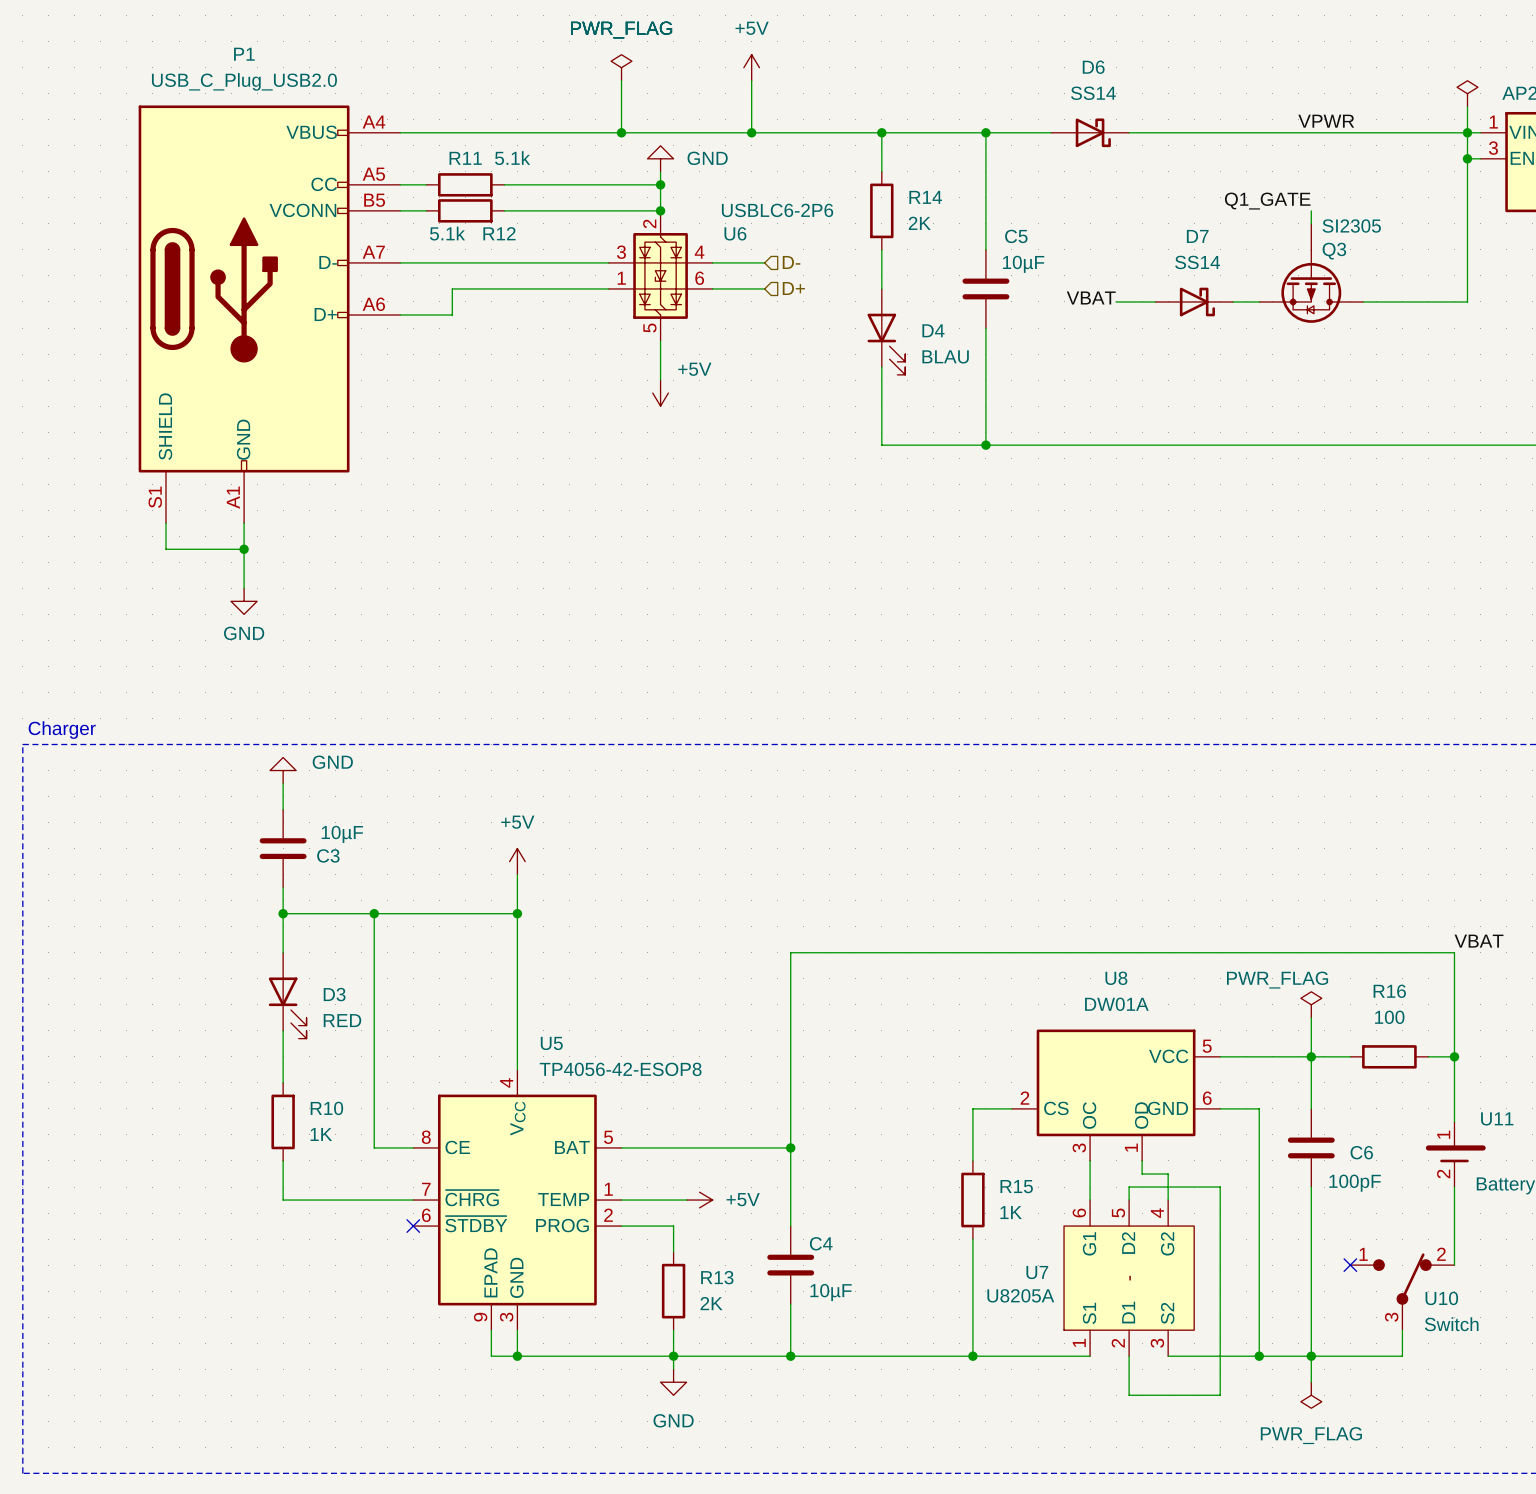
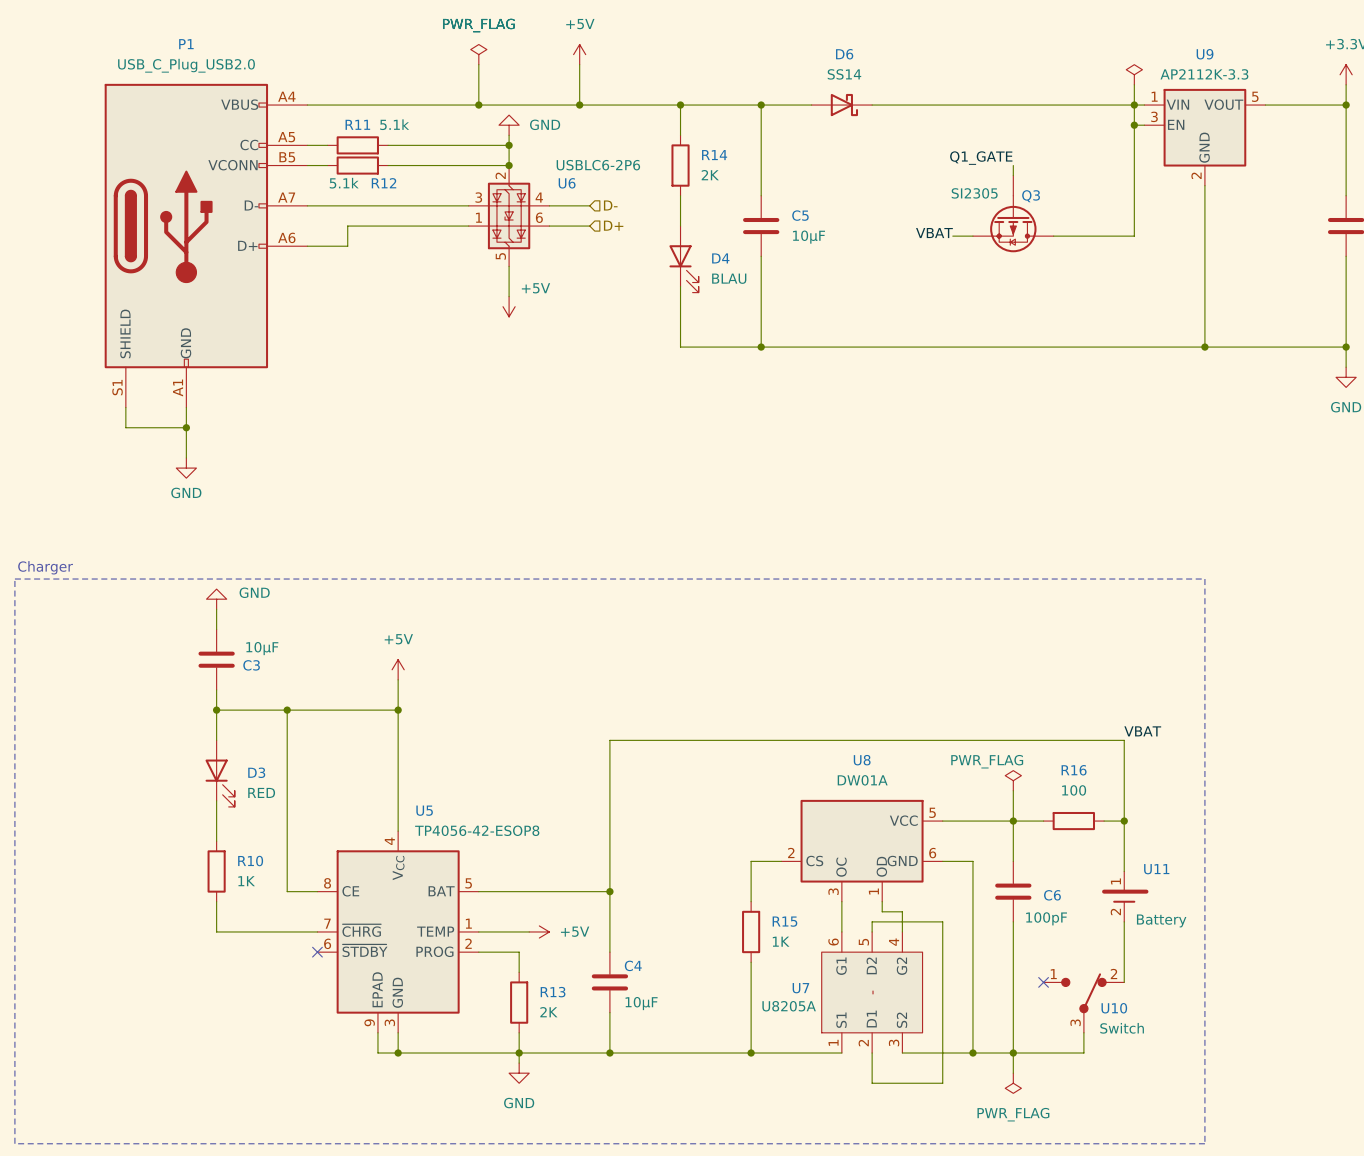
label: VPWR (1326, 121) -> none
Q3 value position: SI2305 (1351, 226) -> SI2305 (974, 193)
C5 name position: C5 (1016, 236) -> C5 (800, 215)
C5 value position: 10µF (1023, 264) -> 10µF (808, 237)
label position: VBAT (1091, 297) -> VBAT (934, 233)
wire: (1116, 301) (1155, 301) -> none
D7: SS14 (1194, 301) -> none

